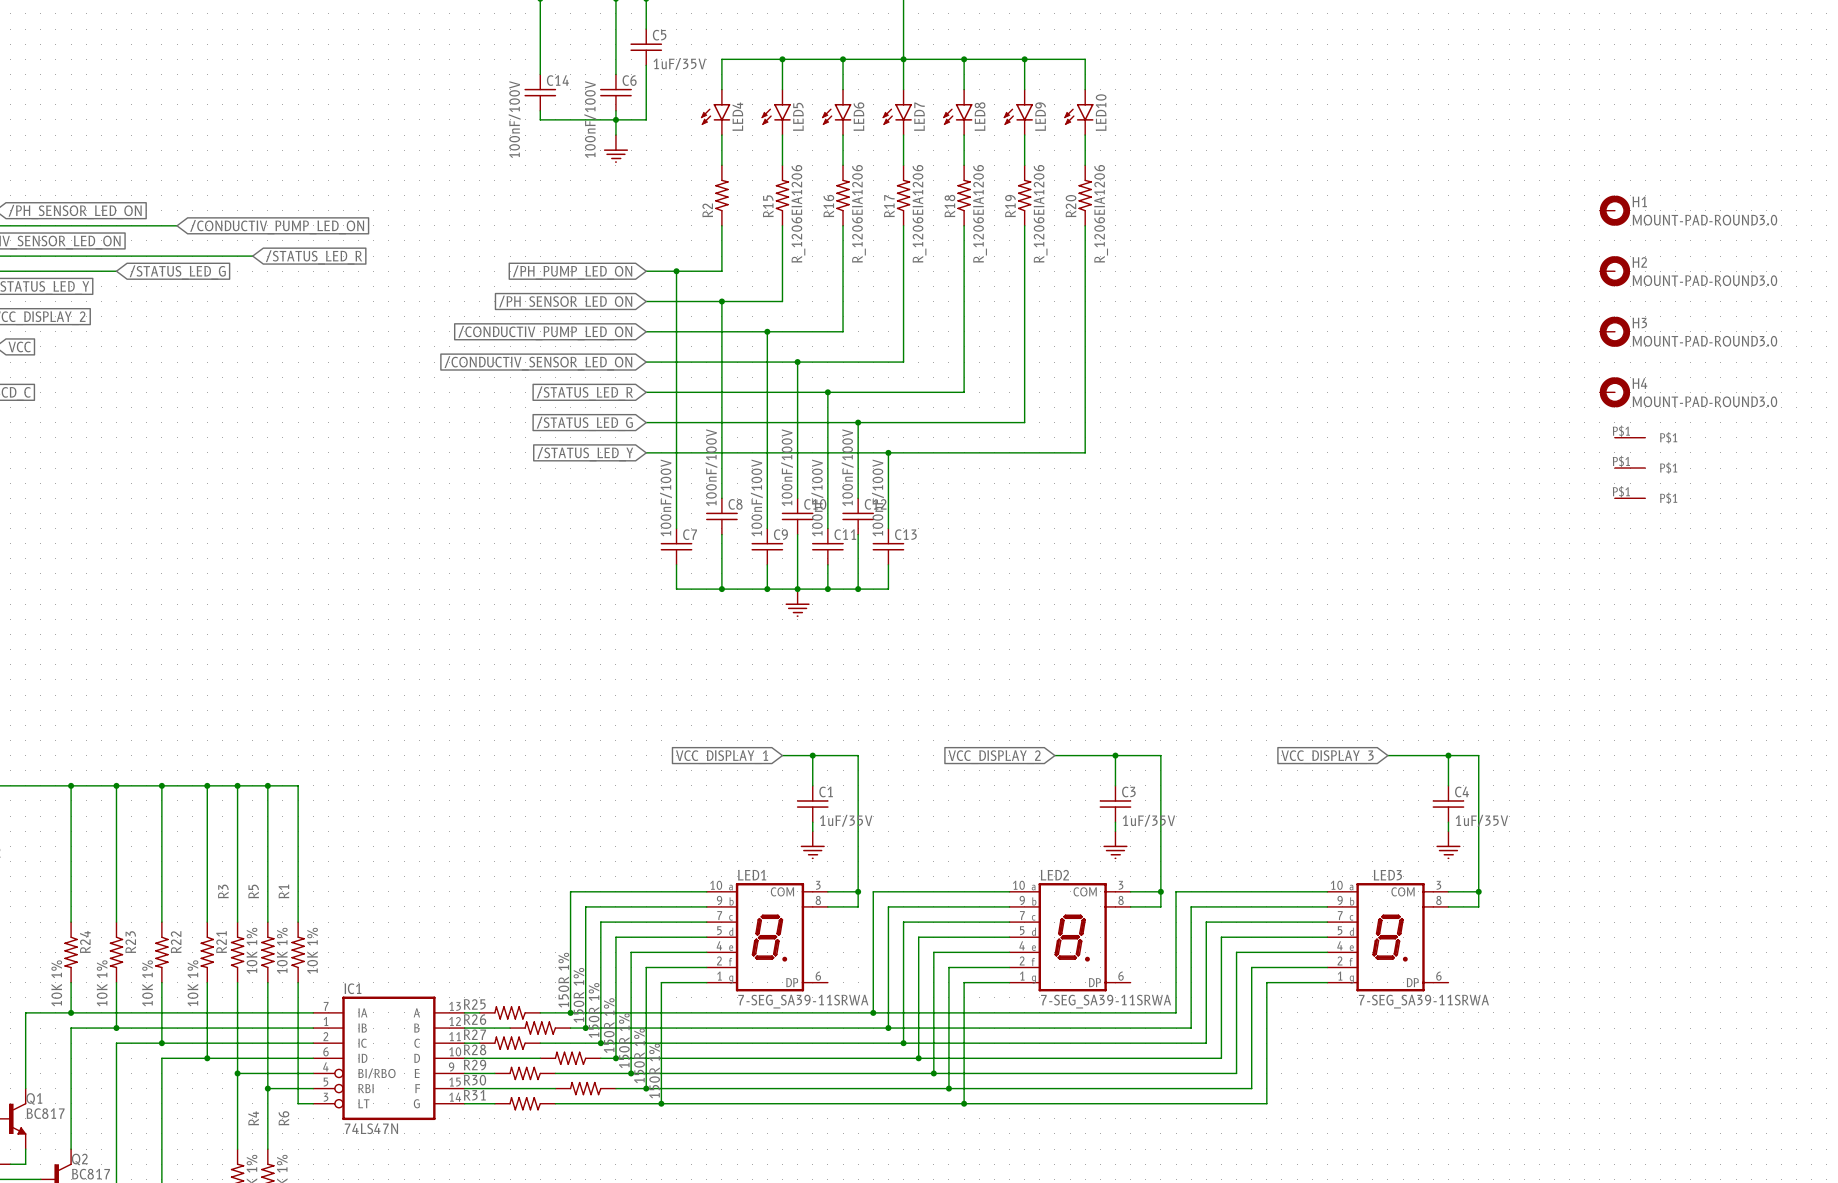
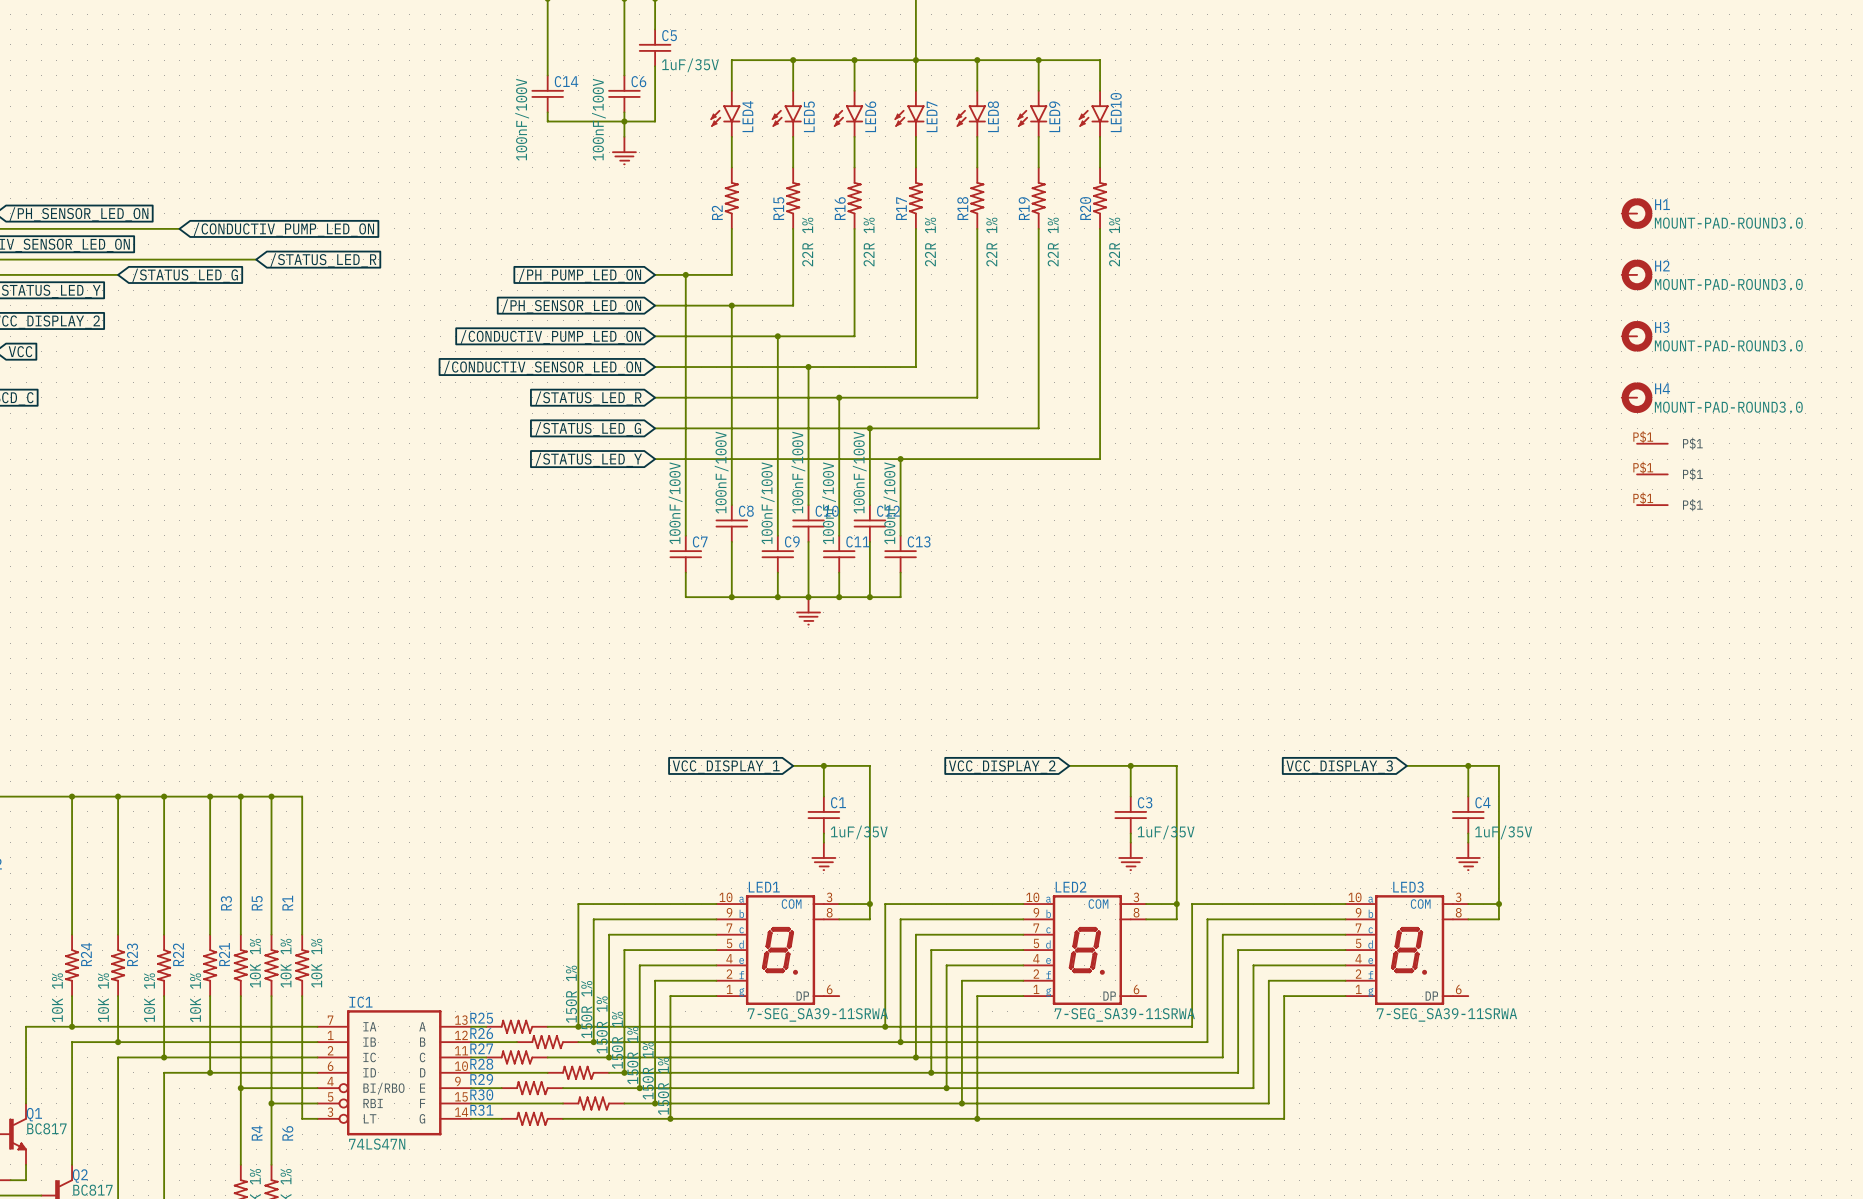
R15 value: R_1206EIA1206 (798, 213) -> 22R 1% (807, 242)
R16 value: R_1206EIA1206 (858, 213) -> 22R 1% (869, 242)
R17 value: R_1206EIA1206 (919, 213) -> 22R 1% (930, 242)
R18 value: R_1206EIA1206 (980, 213) -> 22R 1% (991, 242)
R19 value: R_1206EIA1206 (1040, 213) -> 22R 1% (1053, 242)
R20 value: R_1206EIA1206 (1101, 213) -> 22R 1% (1114, 242)

